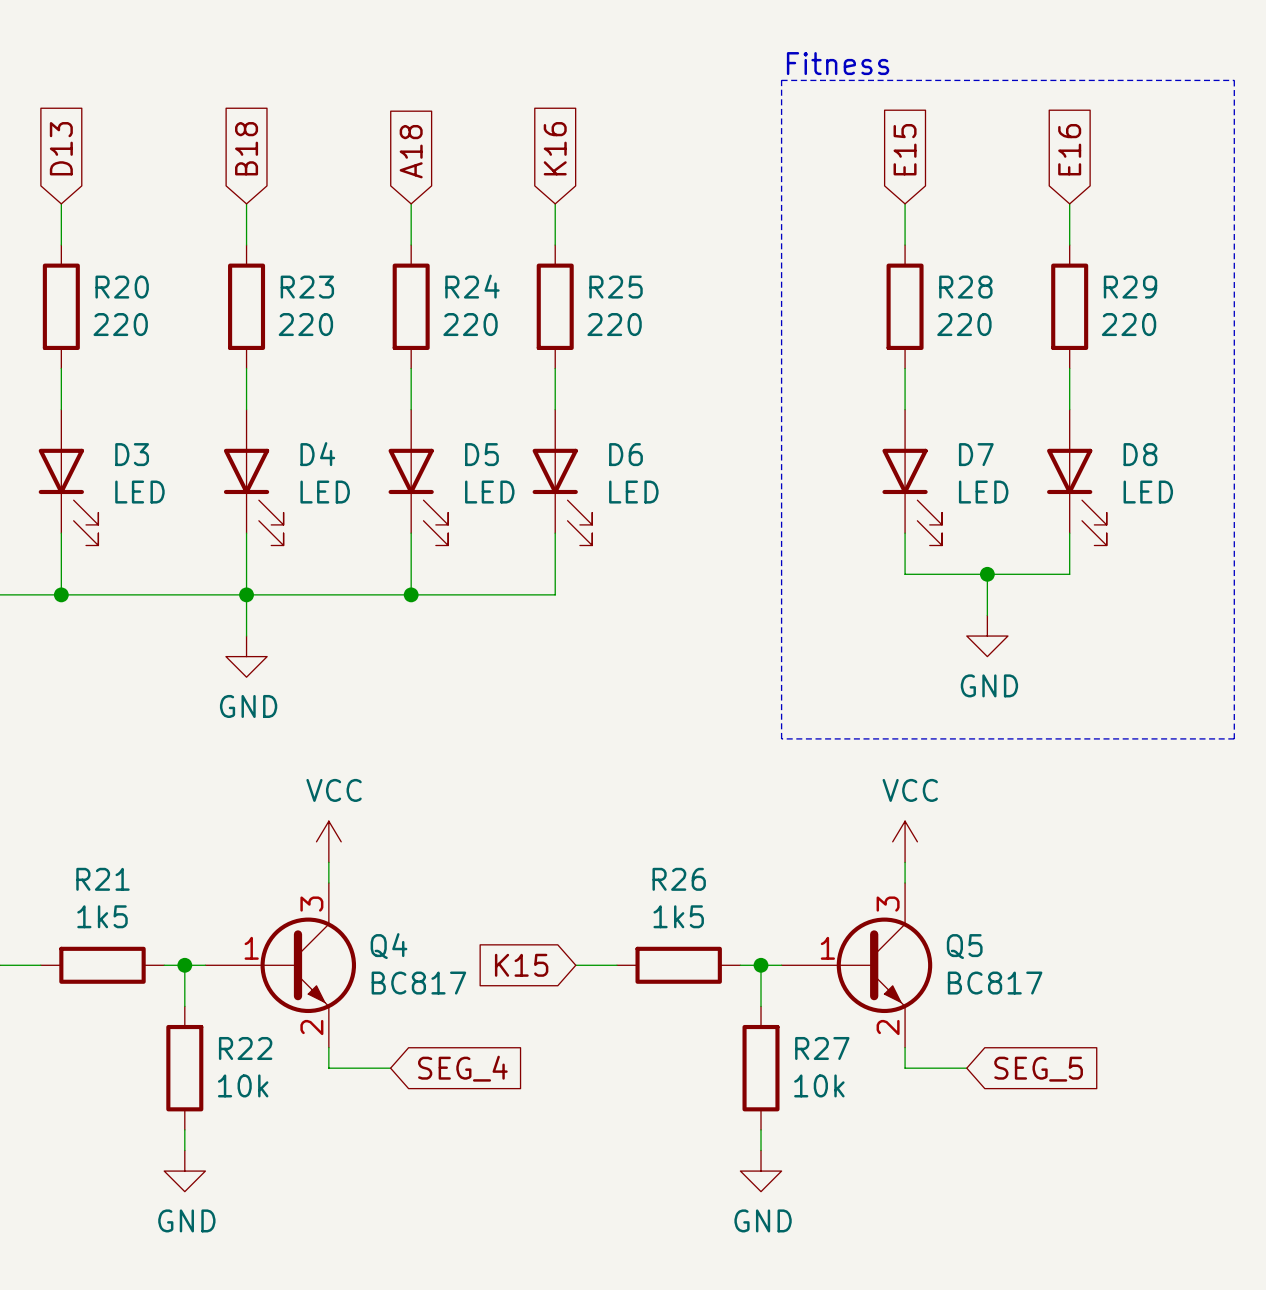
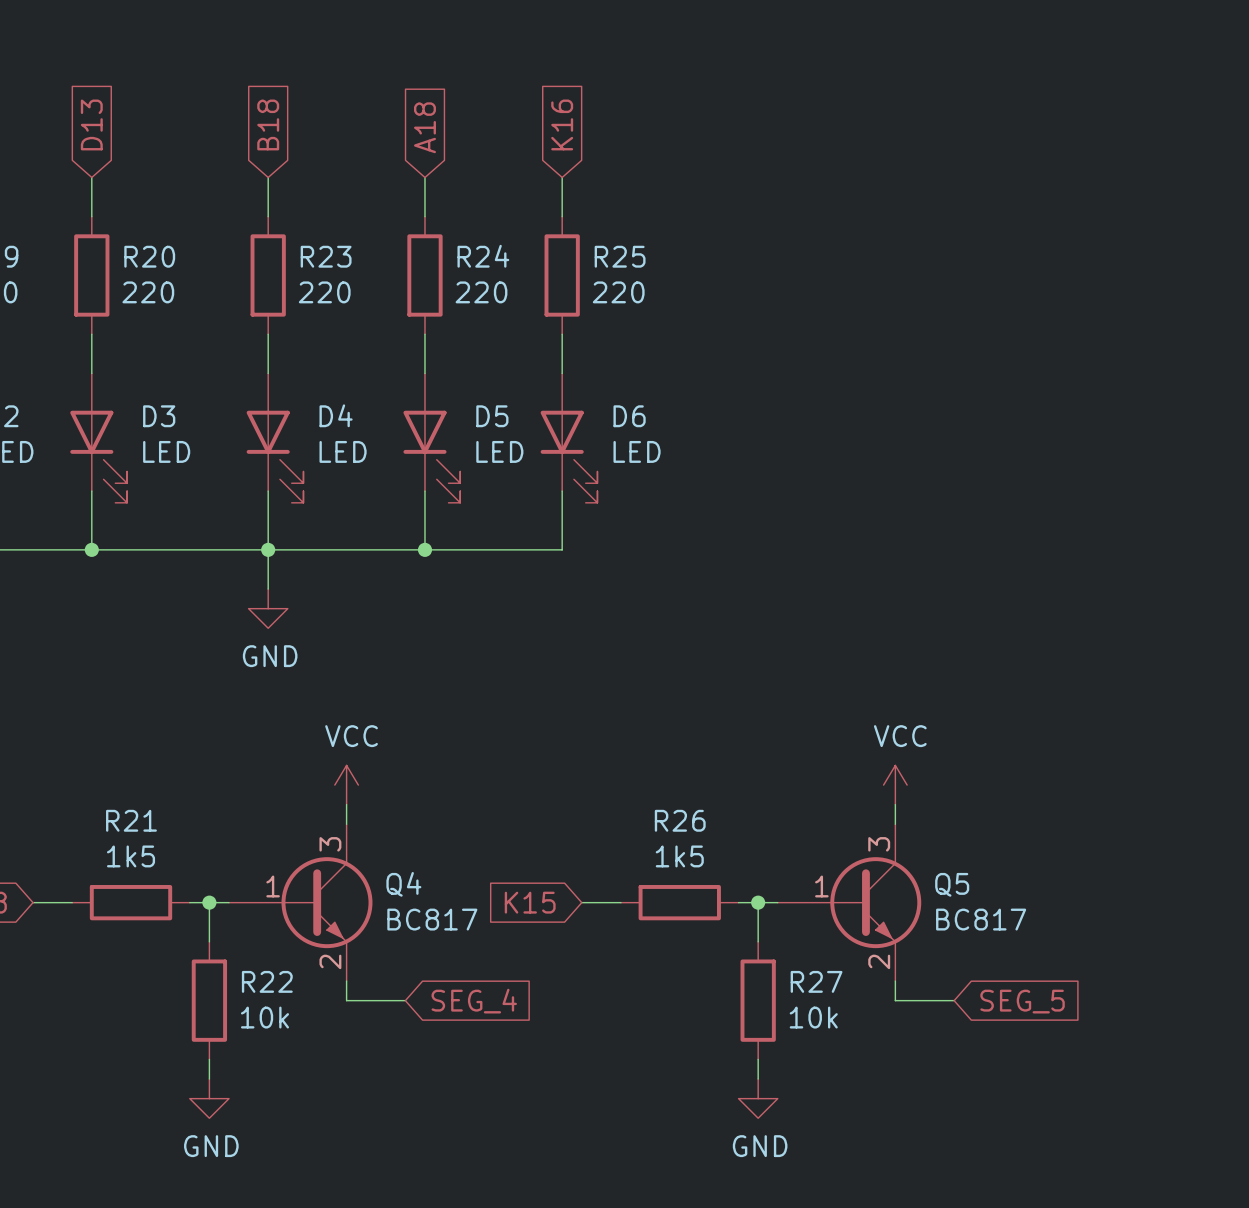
text: Fitness (838, 63) -> none
line: (781, 80) (1234, 80) (1234, 738) (781, 738) (781, 80) -> none
global label: E15 (905, 149) -> none
global label: E16 (1069, 149) -> none
wire: (905, 203) (905, 245) -> none
wire: (1069, 203) (1069, 245) -> none
R28: 220 (905, 306) -> none
R29: 220 (1069, 306) -> none
wire: (905, 368) (905, 409) -> none
wire: (1069, 368) (1069, 409) -> none
D7: LED (912, 477) -> none
D8: LED (1076, 477) -> none
wire: (905, 533) (905, 574) (1069, 574) (1069, 533) -> none
wire: (987, 574) (987, 615) -> none
junction: (987, 574) -> none
power symbol: GND (987, 636) -> none

